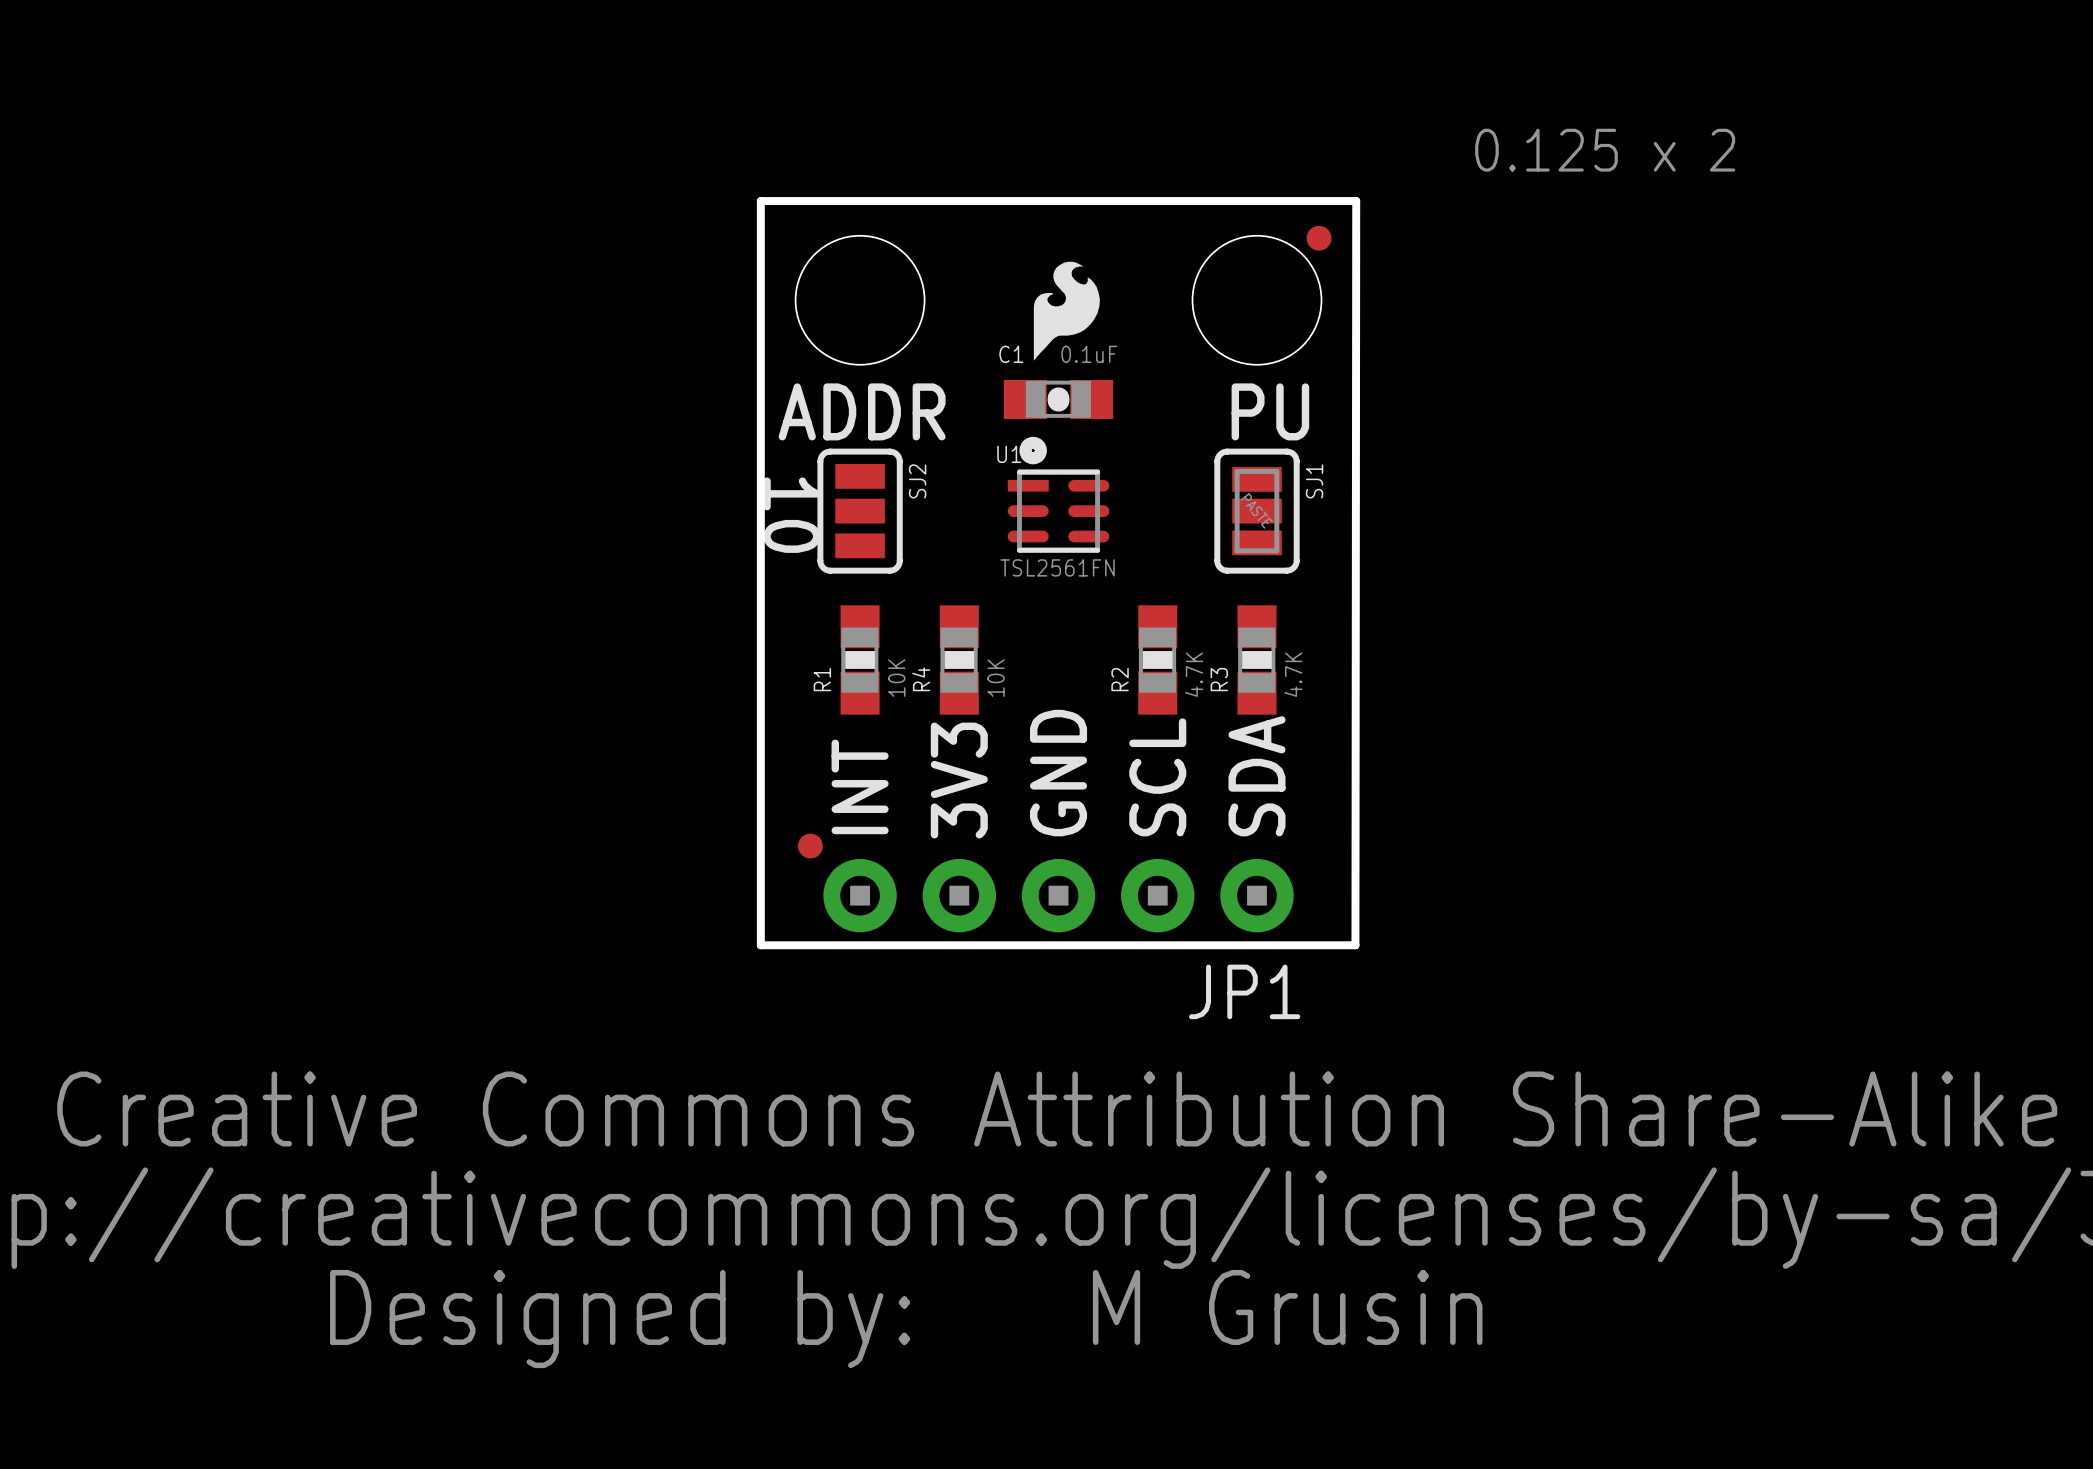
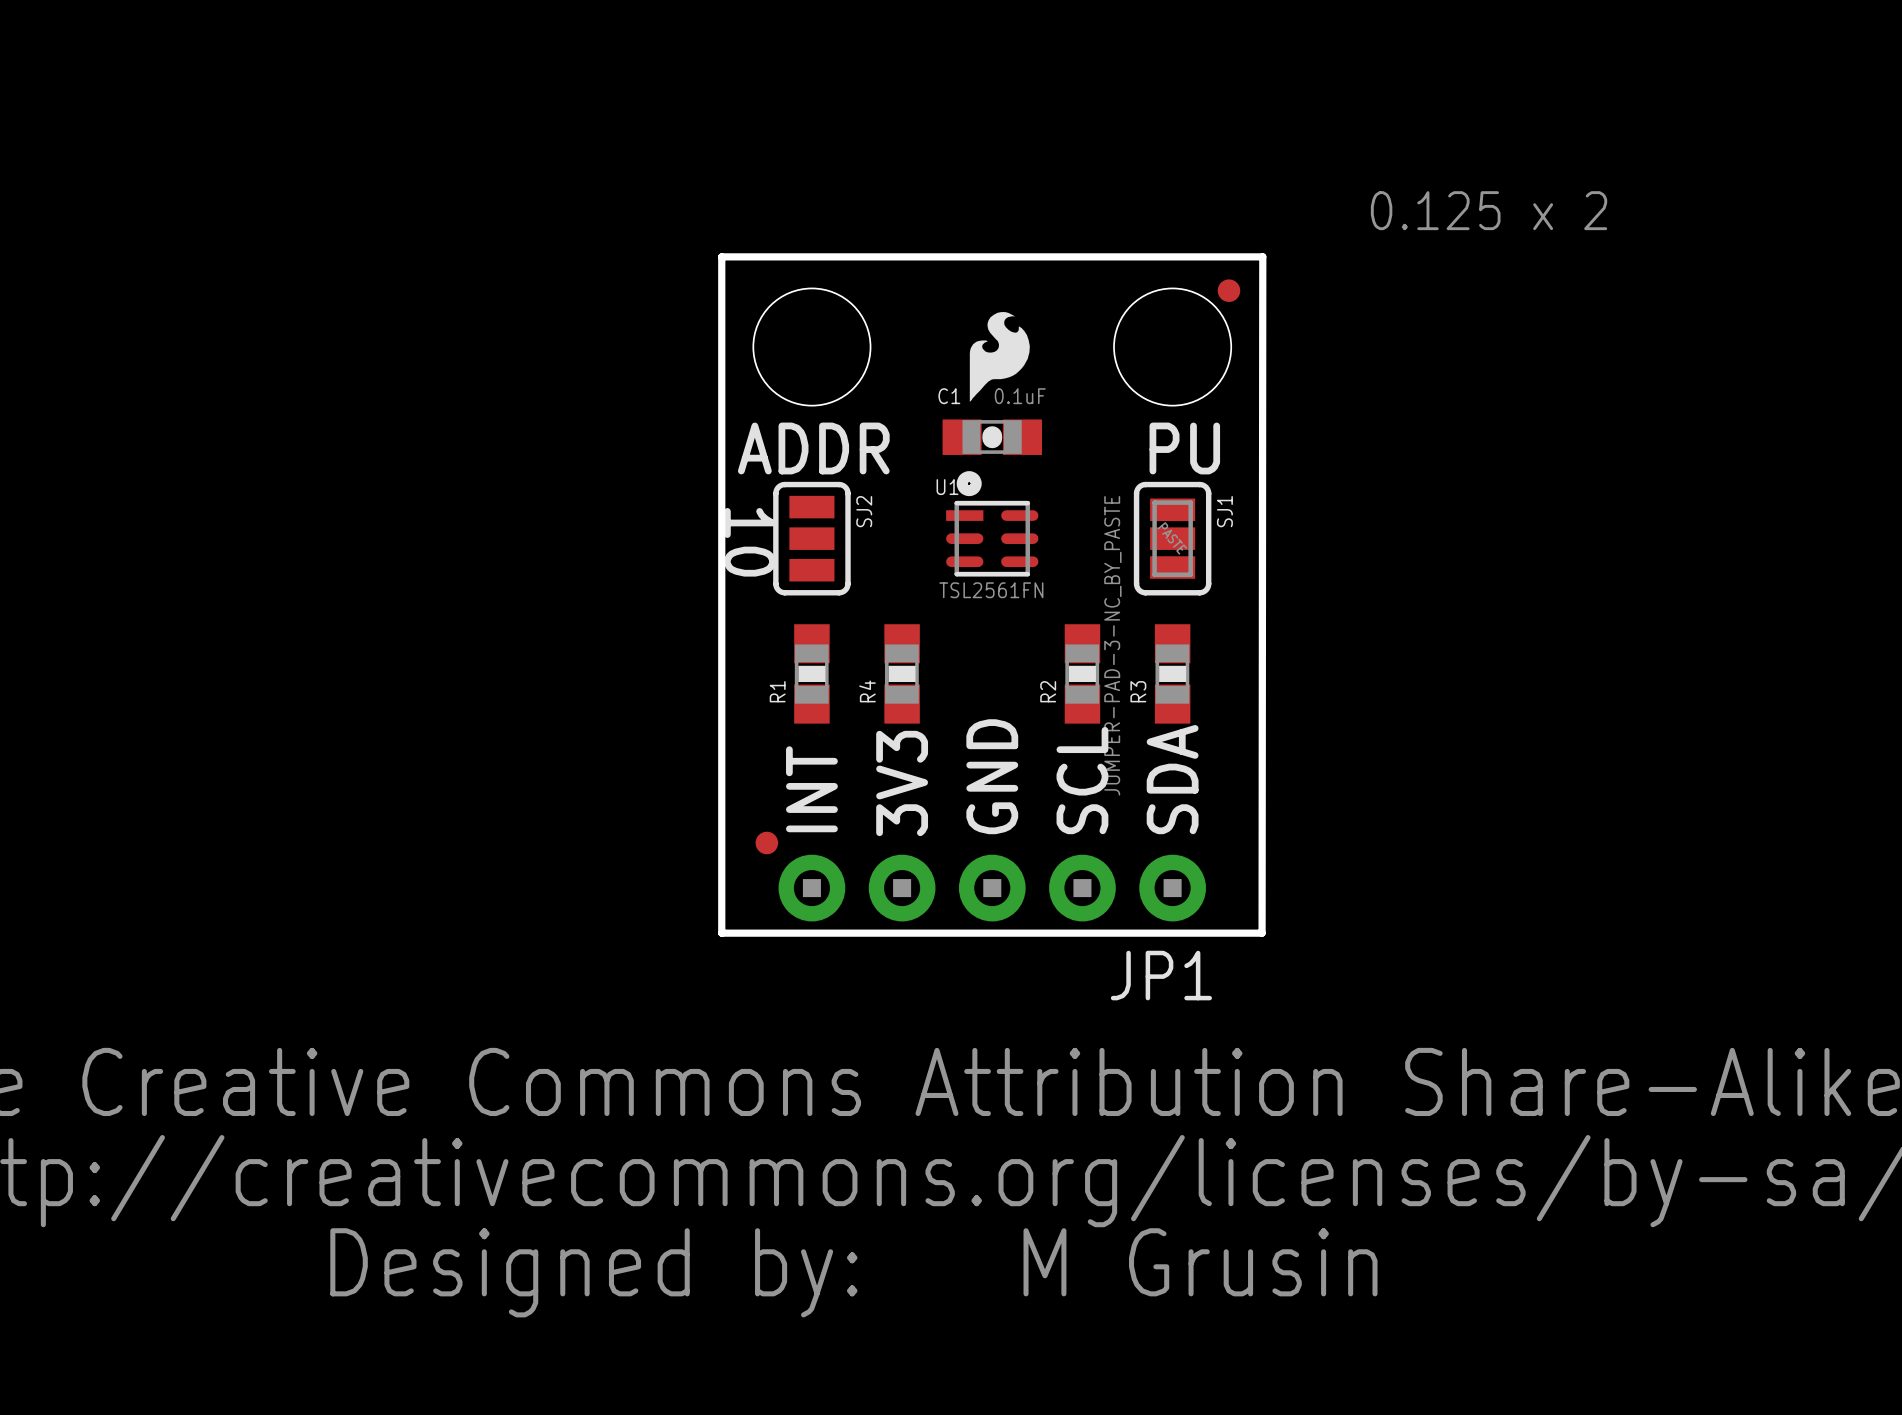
SJ1 value: none -> JUMPER-PAD-3-NC_BY_PASTE (1112, 645)
R2 value: 4.7K (1194, 674) -> none
R3 value: 4.7K (1293, 674) -> none
R1 value: 10K (896, 678) -> none
R4 value: 10K (996, 678) -> none

